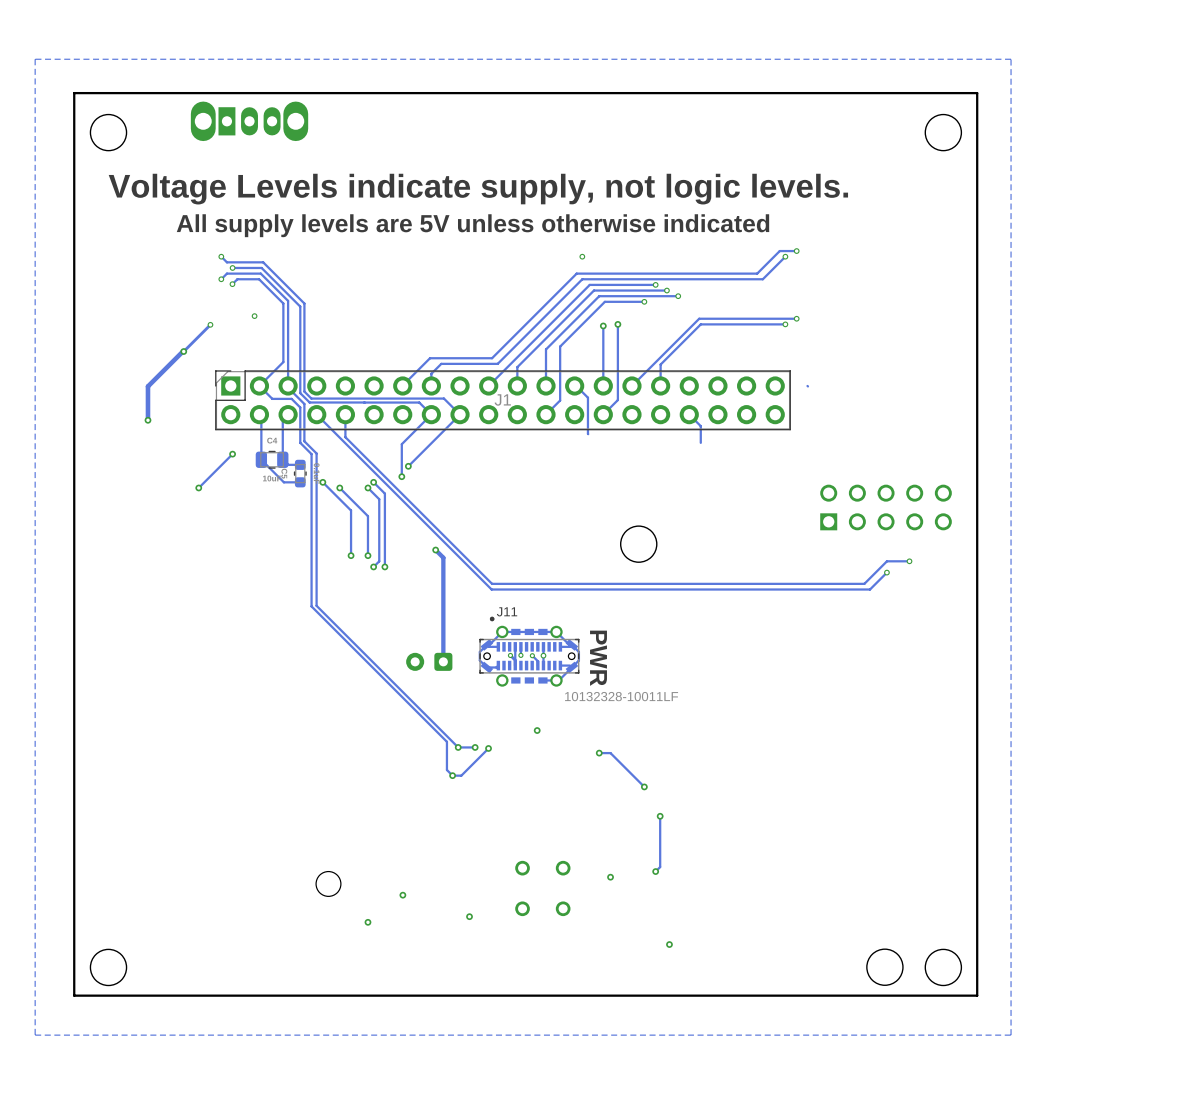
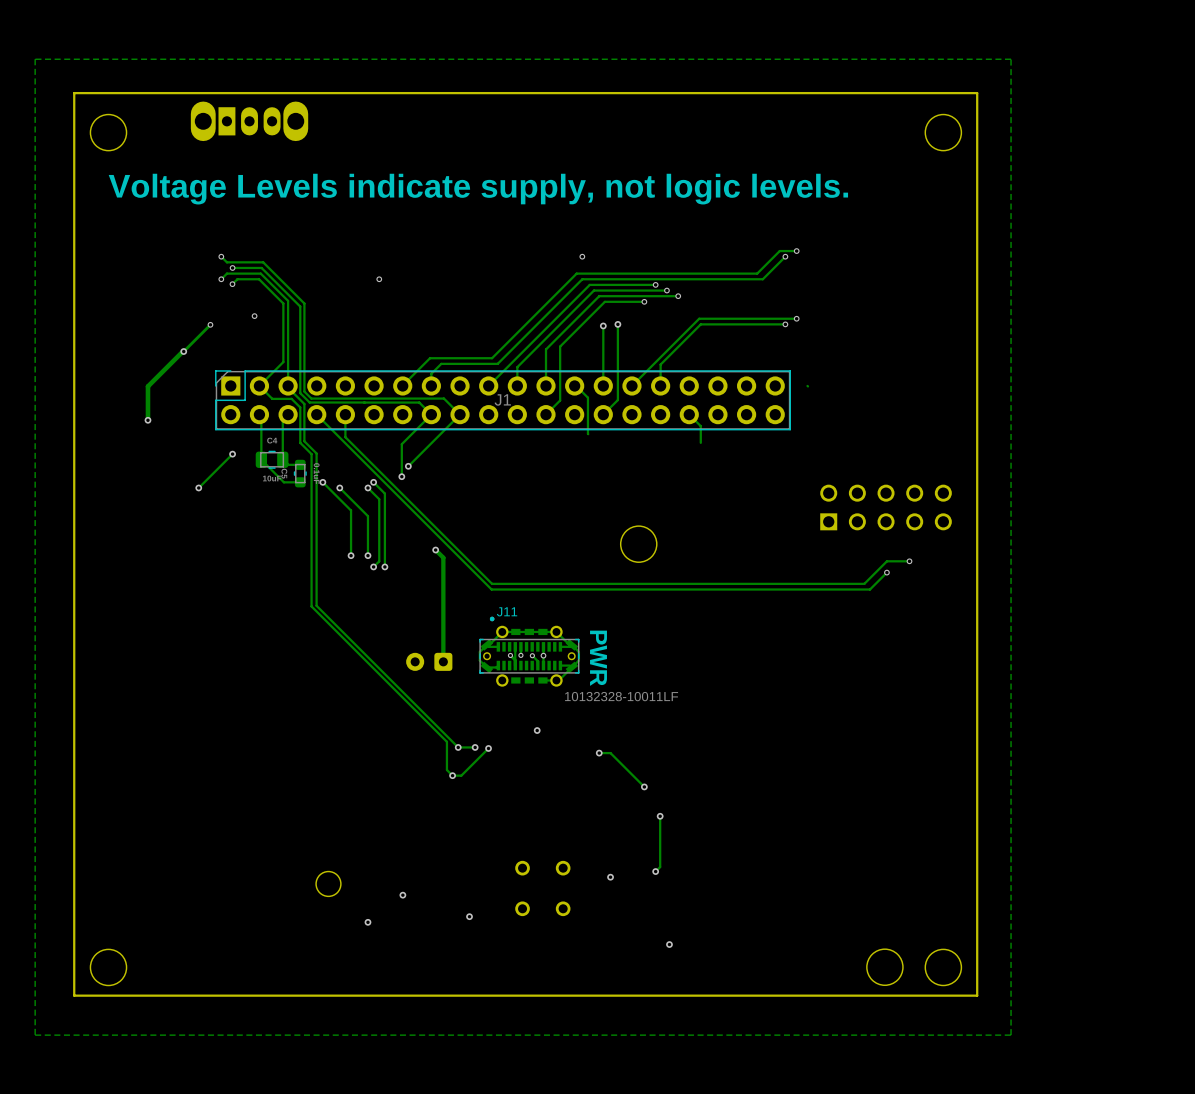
text: All supply levels are 5V unless otherwise indicated (473, 225) -> none
via: none -> (379, 279)

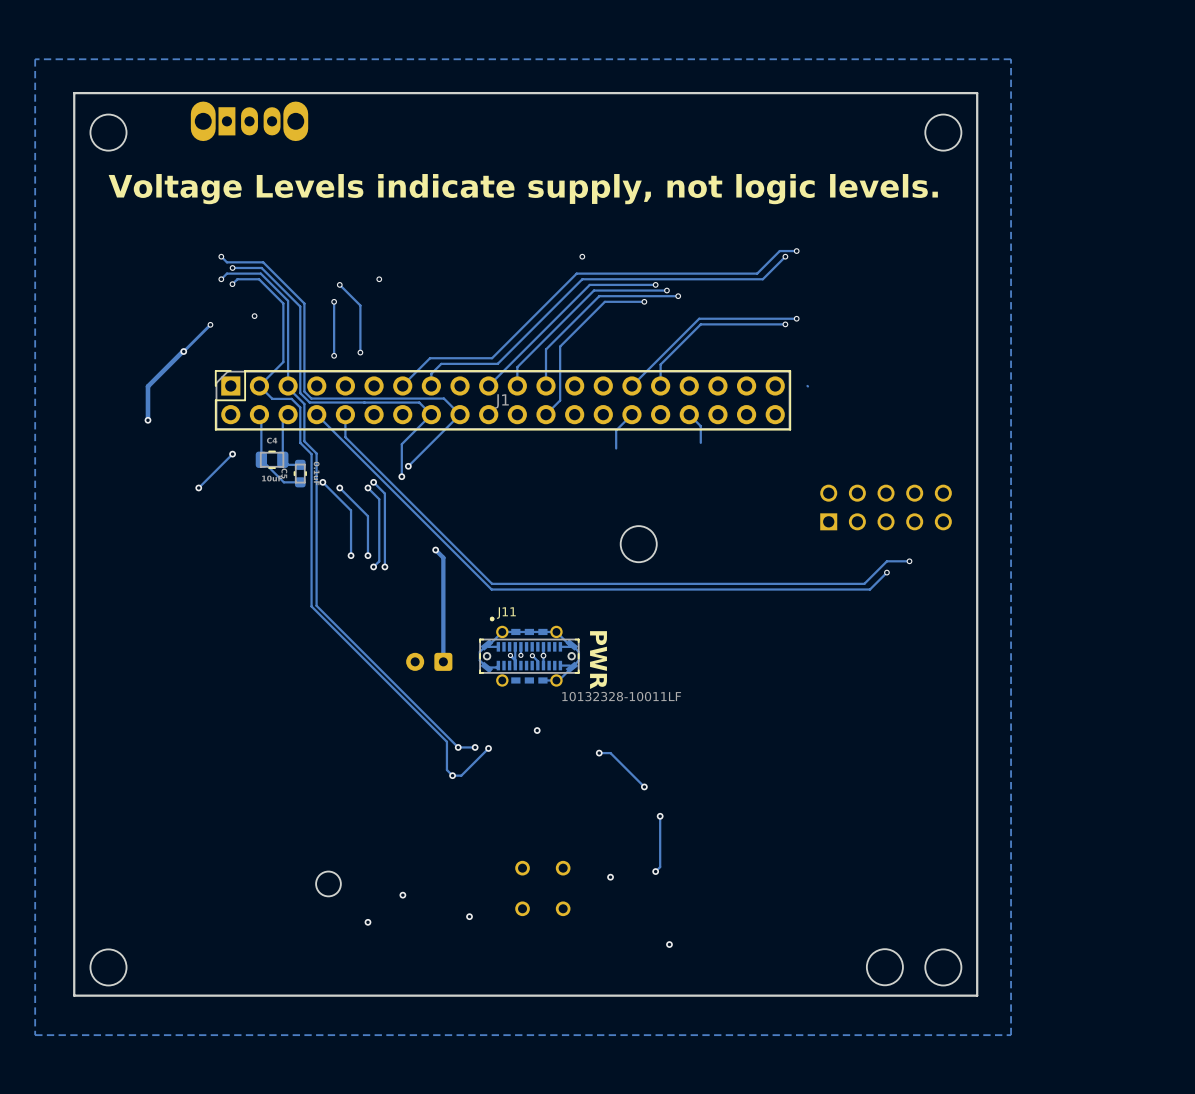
track: none -> (339, 284) (360, 305) (360, 352)
via: none -> (339, 284)
track: none -> (334, 301) (334, 355)
via: none -> (334, 301)
track: (617, 324) (617, 400) (603, 414) -> none
via: (617, 324) -> none
track: (603, 325) (603, 385) -> none
via: (603, 325) -> none
via: none -> (360, 352)
via: none -> (334, 355)
track: (574, 385) (587, 397) (588, 434) -> none
track: none -> (631, 414) (616, 430) (616, 448)

